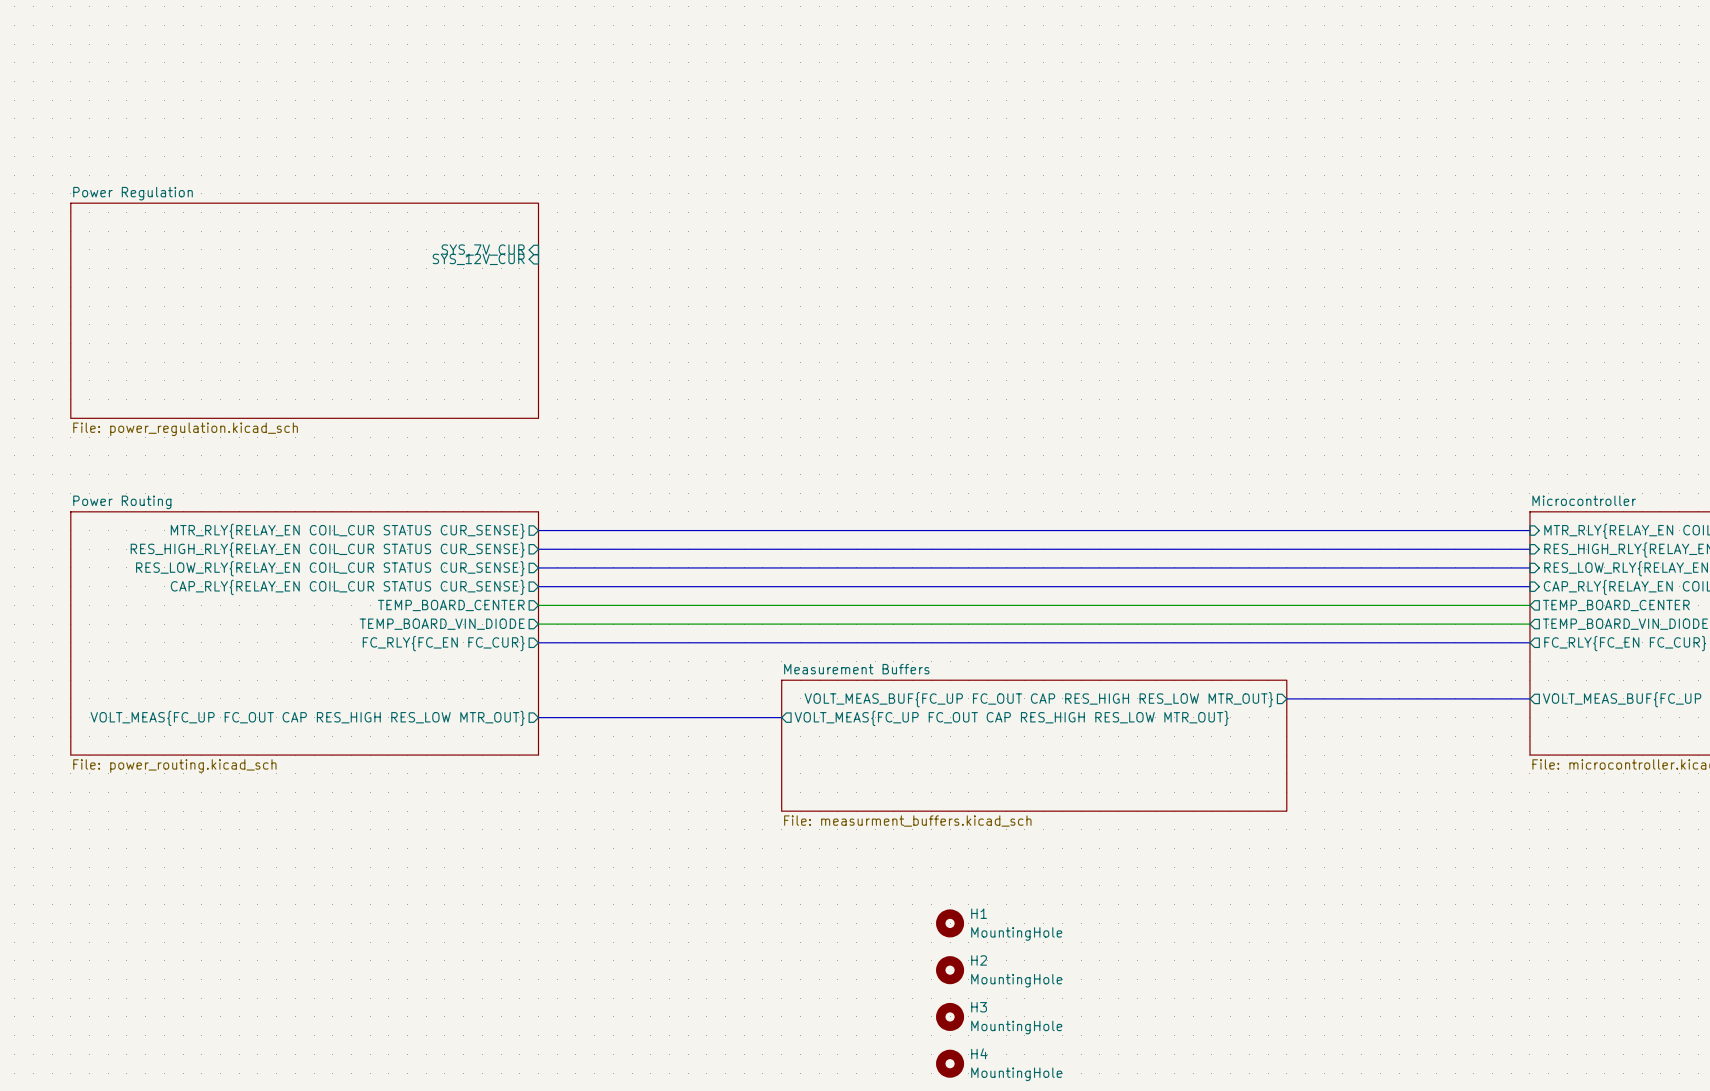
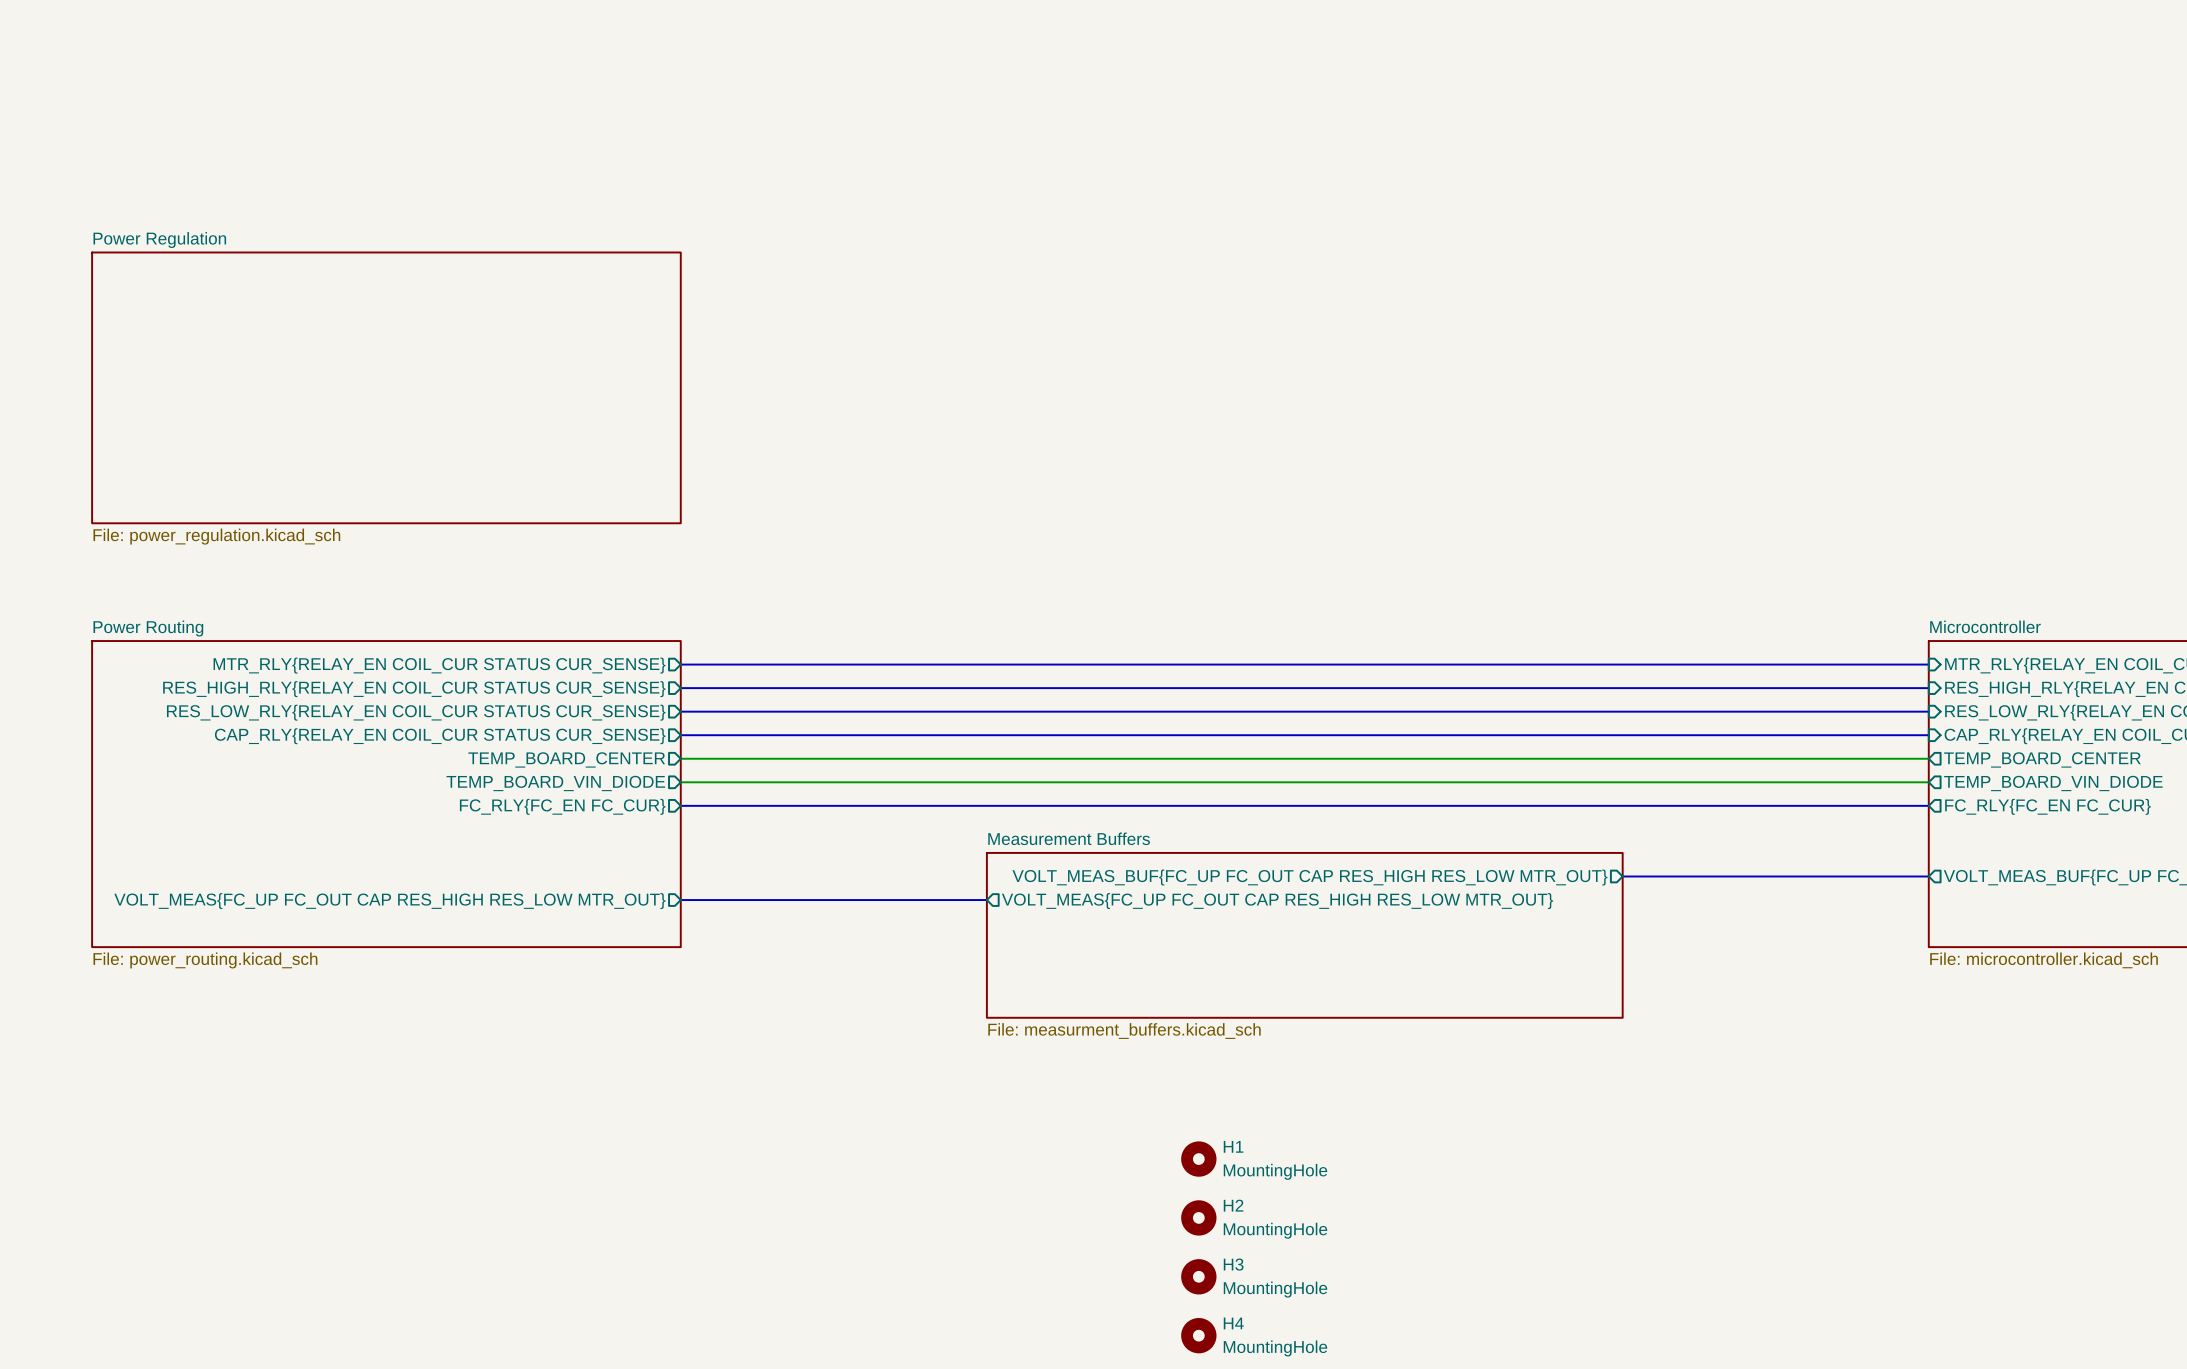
sheet pin: SYS_7V_CUR (483, 250) -> none
sheet pin: SYS_12V_CUR (478, 259) -> none

